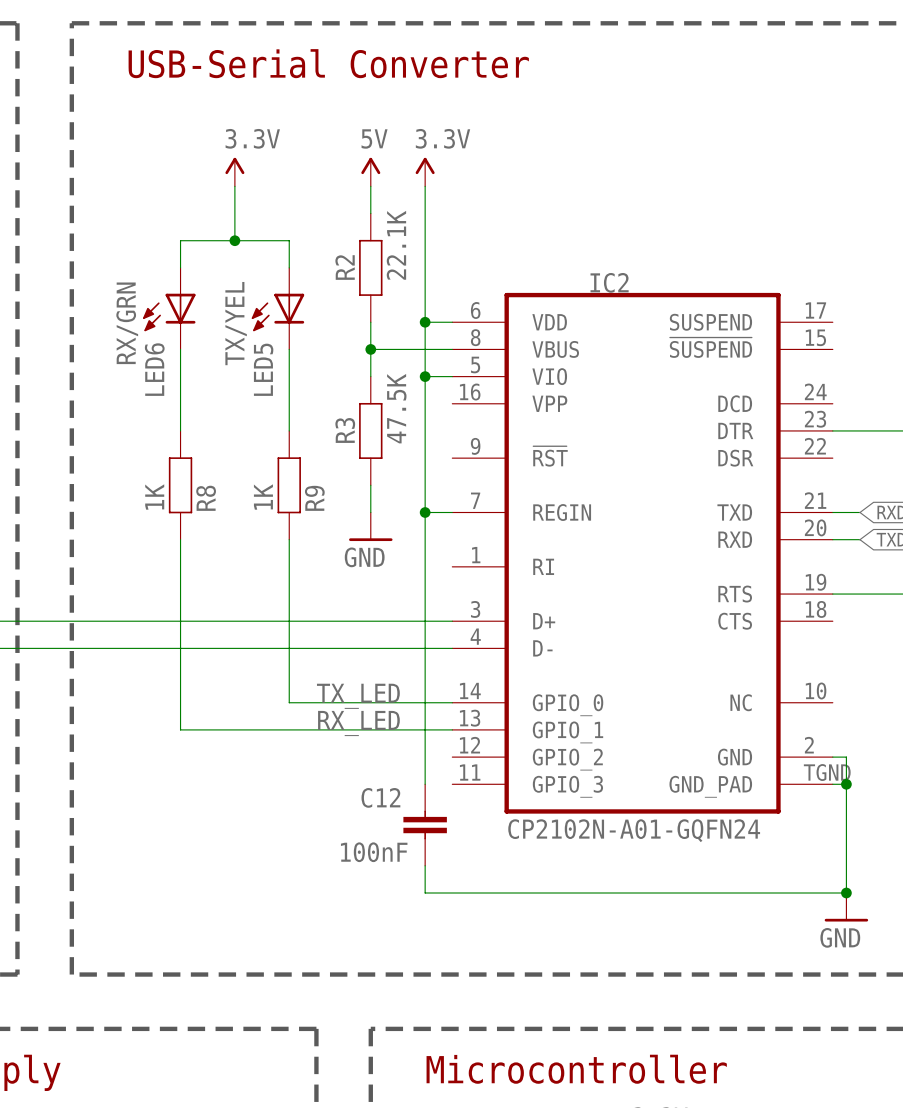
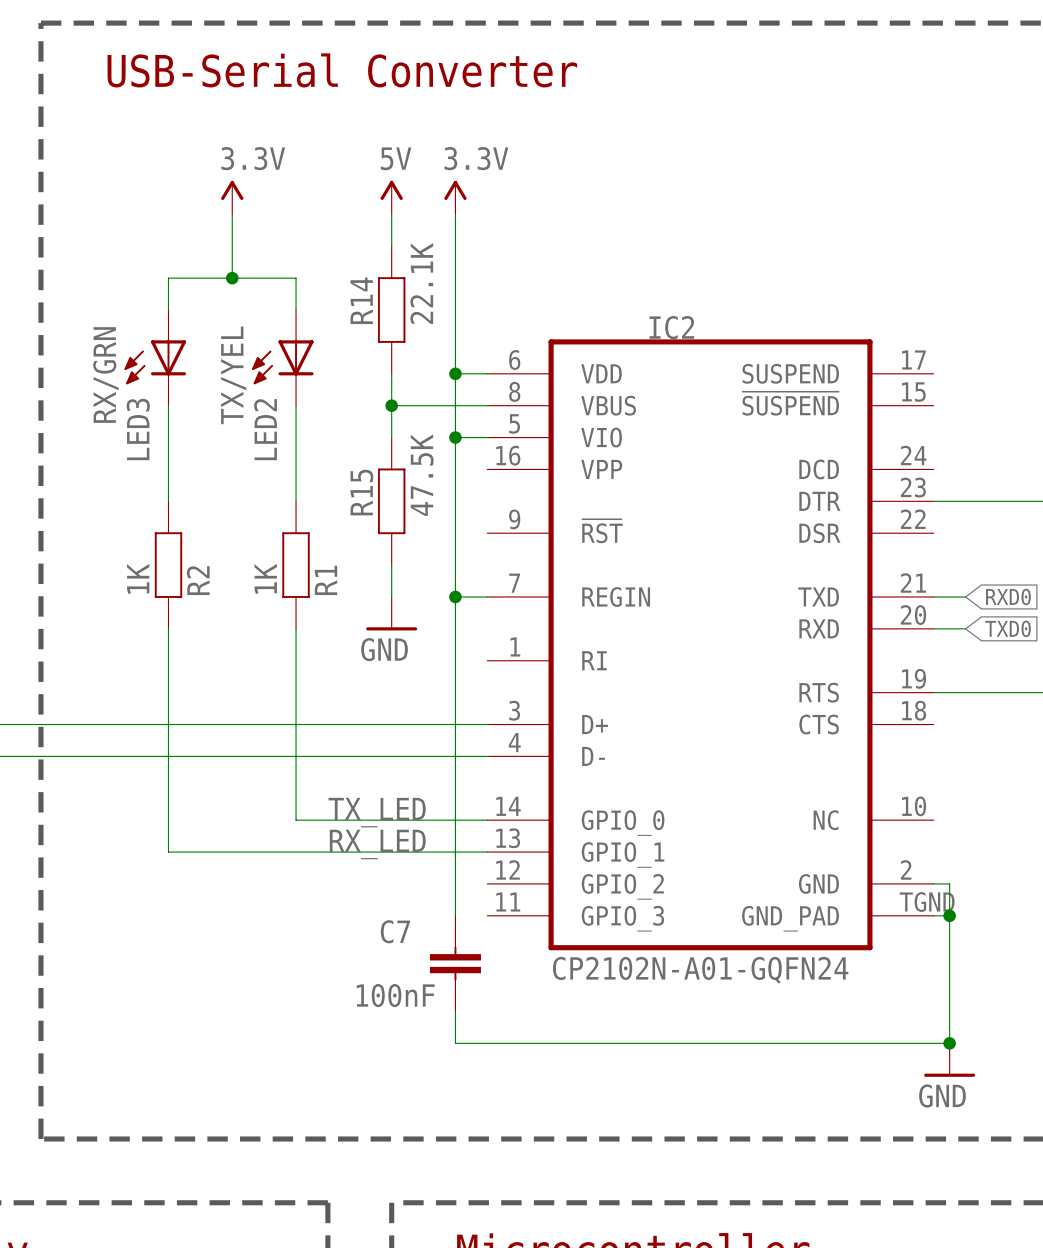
R2 name: R2 (345, 267) -> R14 (361, 300)
LED6 name: LED6 (154, 369) -> LED3 (138, 429)
LED5 name: LED5 (263, 369) -> LED2 (265, 429)
R3 name: R3 (345, 430) -> R15 (361, 492)
R8 name: R8 (206, 498) -> R2 (198, 580)
R9 name: R9 (314, 498) -> R1 (326, 580)
C12 name: C12 (380, 797) -> C7 (395, 931)

